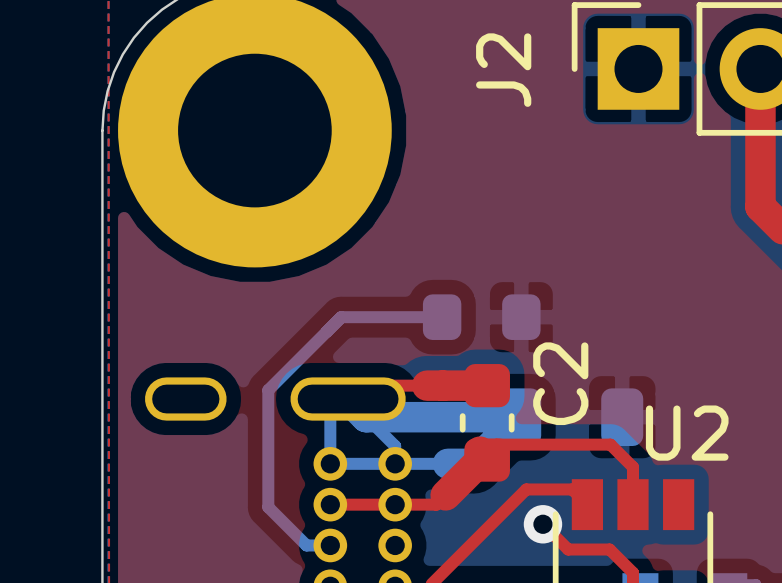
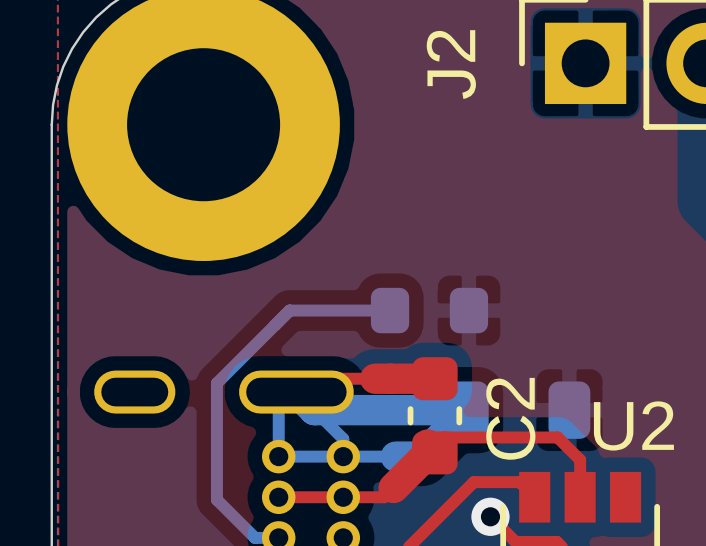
C2 name position: C2 (560, 383) -> C2 (510, 418)

